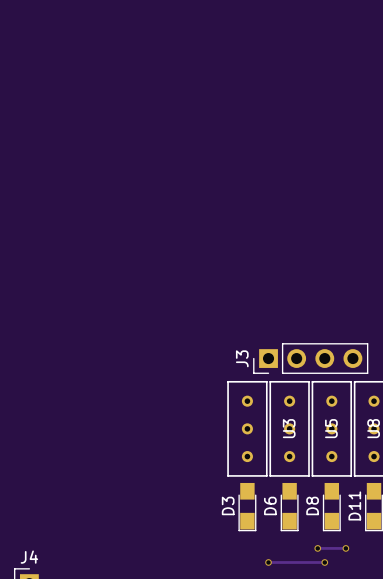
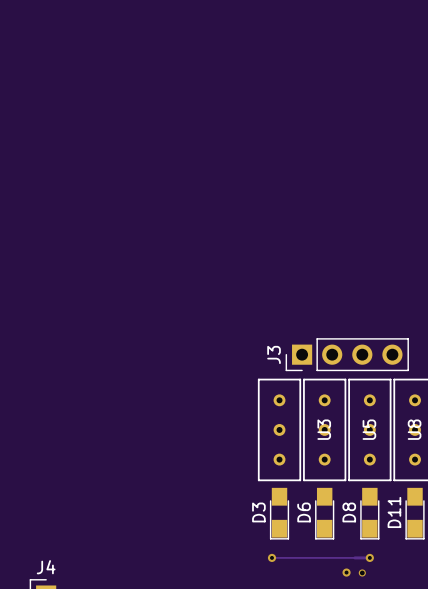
track: none -> (271, 557) (354, 557)
via: none -> (271, 557)
via: (317, 548) -> none
track: (331, 548) (345, 548) -> none
via: none -> (369, 557)
via: (345, 548) -> none
track: (268, 562) (324, 562) -> none
via: (268, 562) -> none
via: none -> (346, 572)

